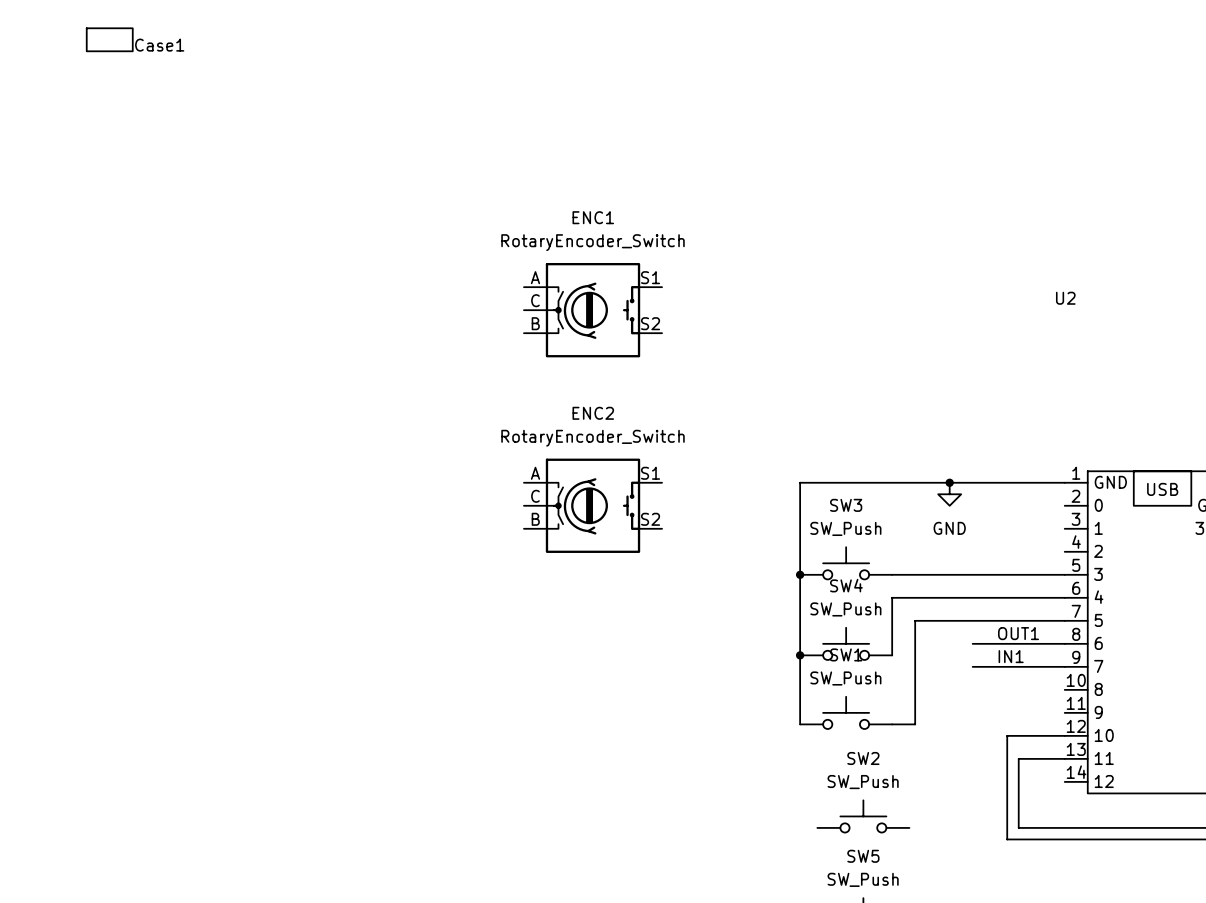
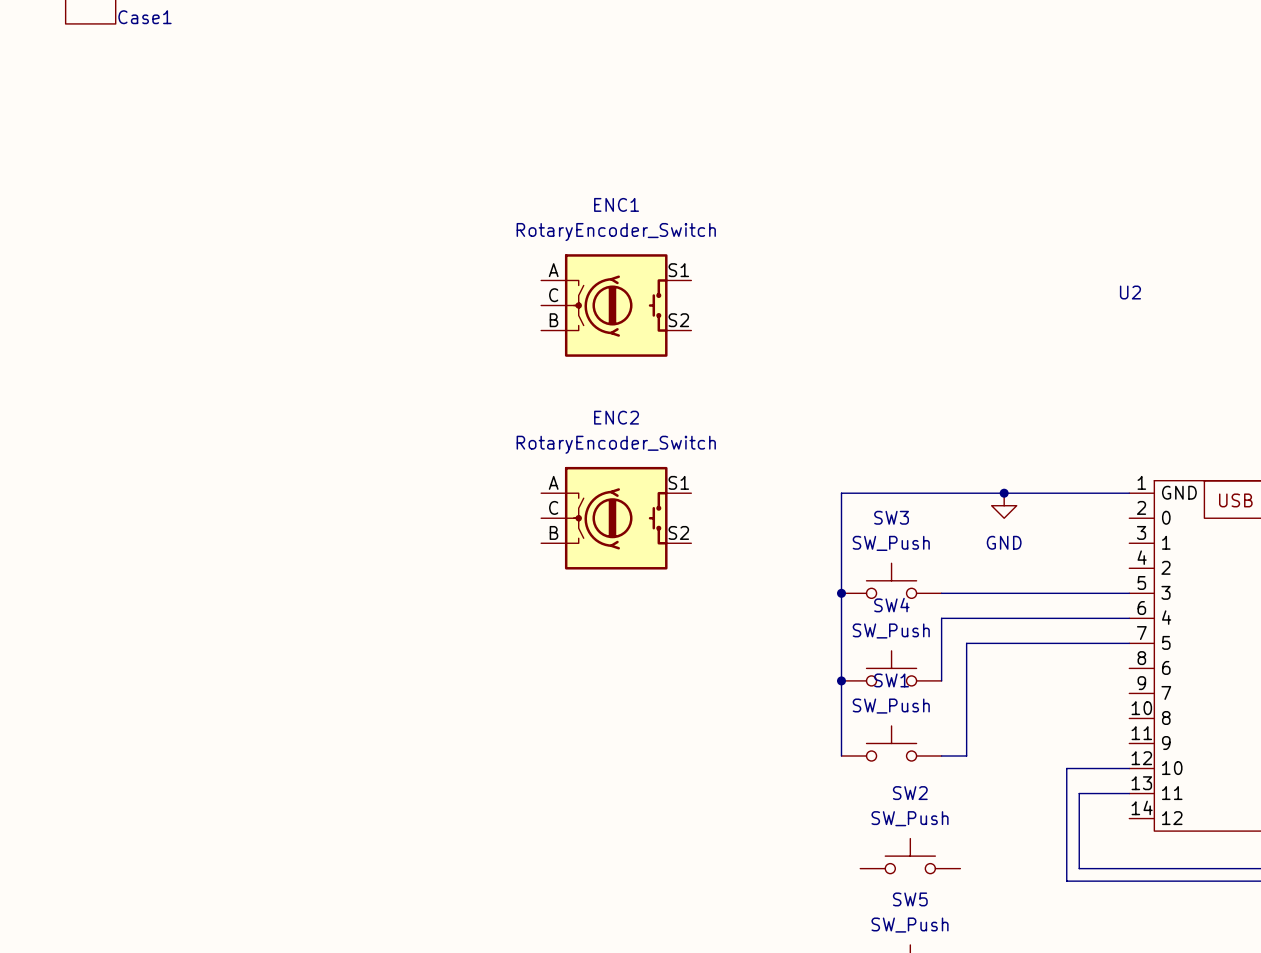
label: OUT1 (1018, 633) -> none
wire: (972, 643) (1064, 643) -> none
label: IN1 (1011, 656) -> none
wire: (972, 666) (1064, 666) -> none

